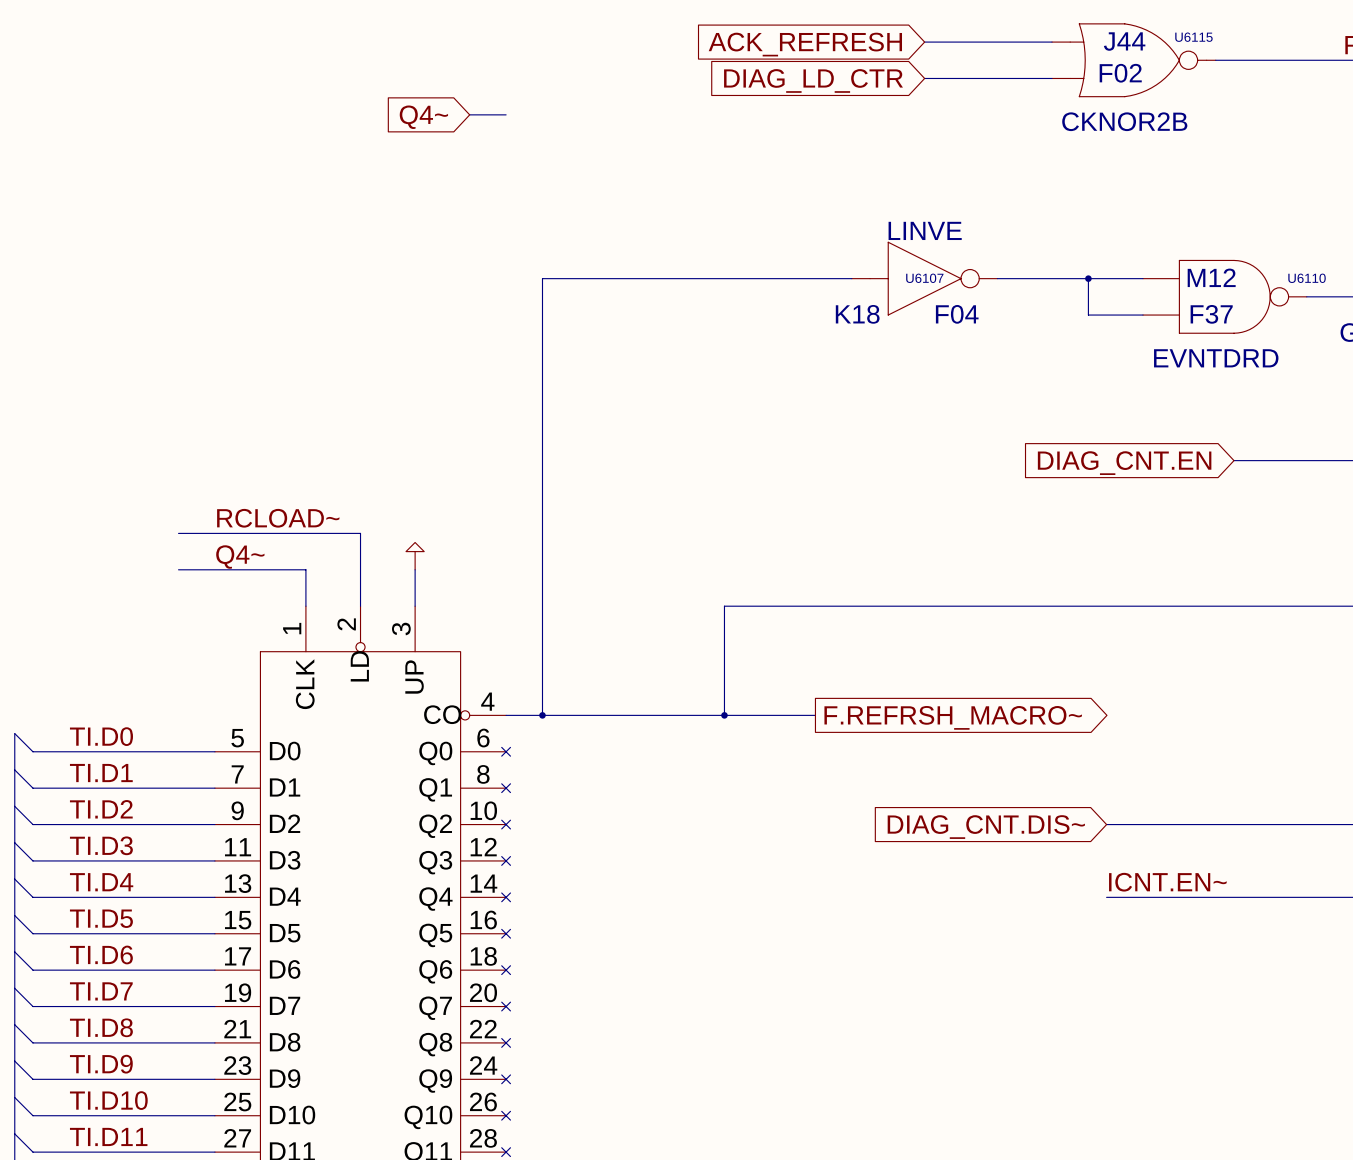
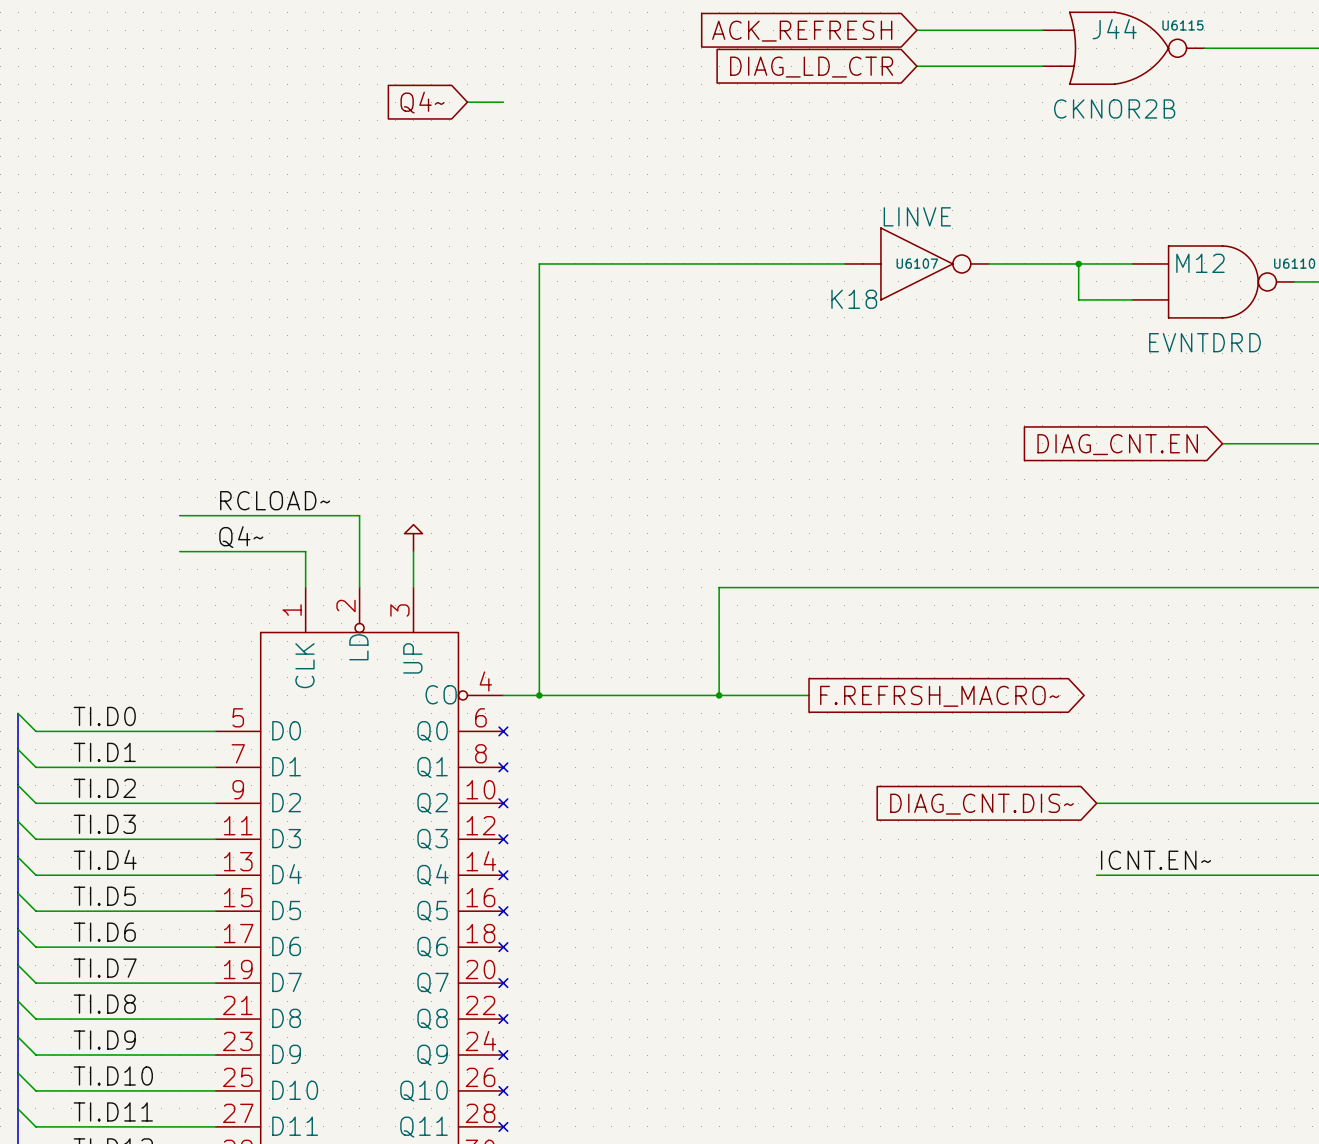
U6115 value: F02 (1120, 73) -> none
U6107 value: F04 (957, 314) -> none
U6110 value: F37 (1211, 314) -> none

